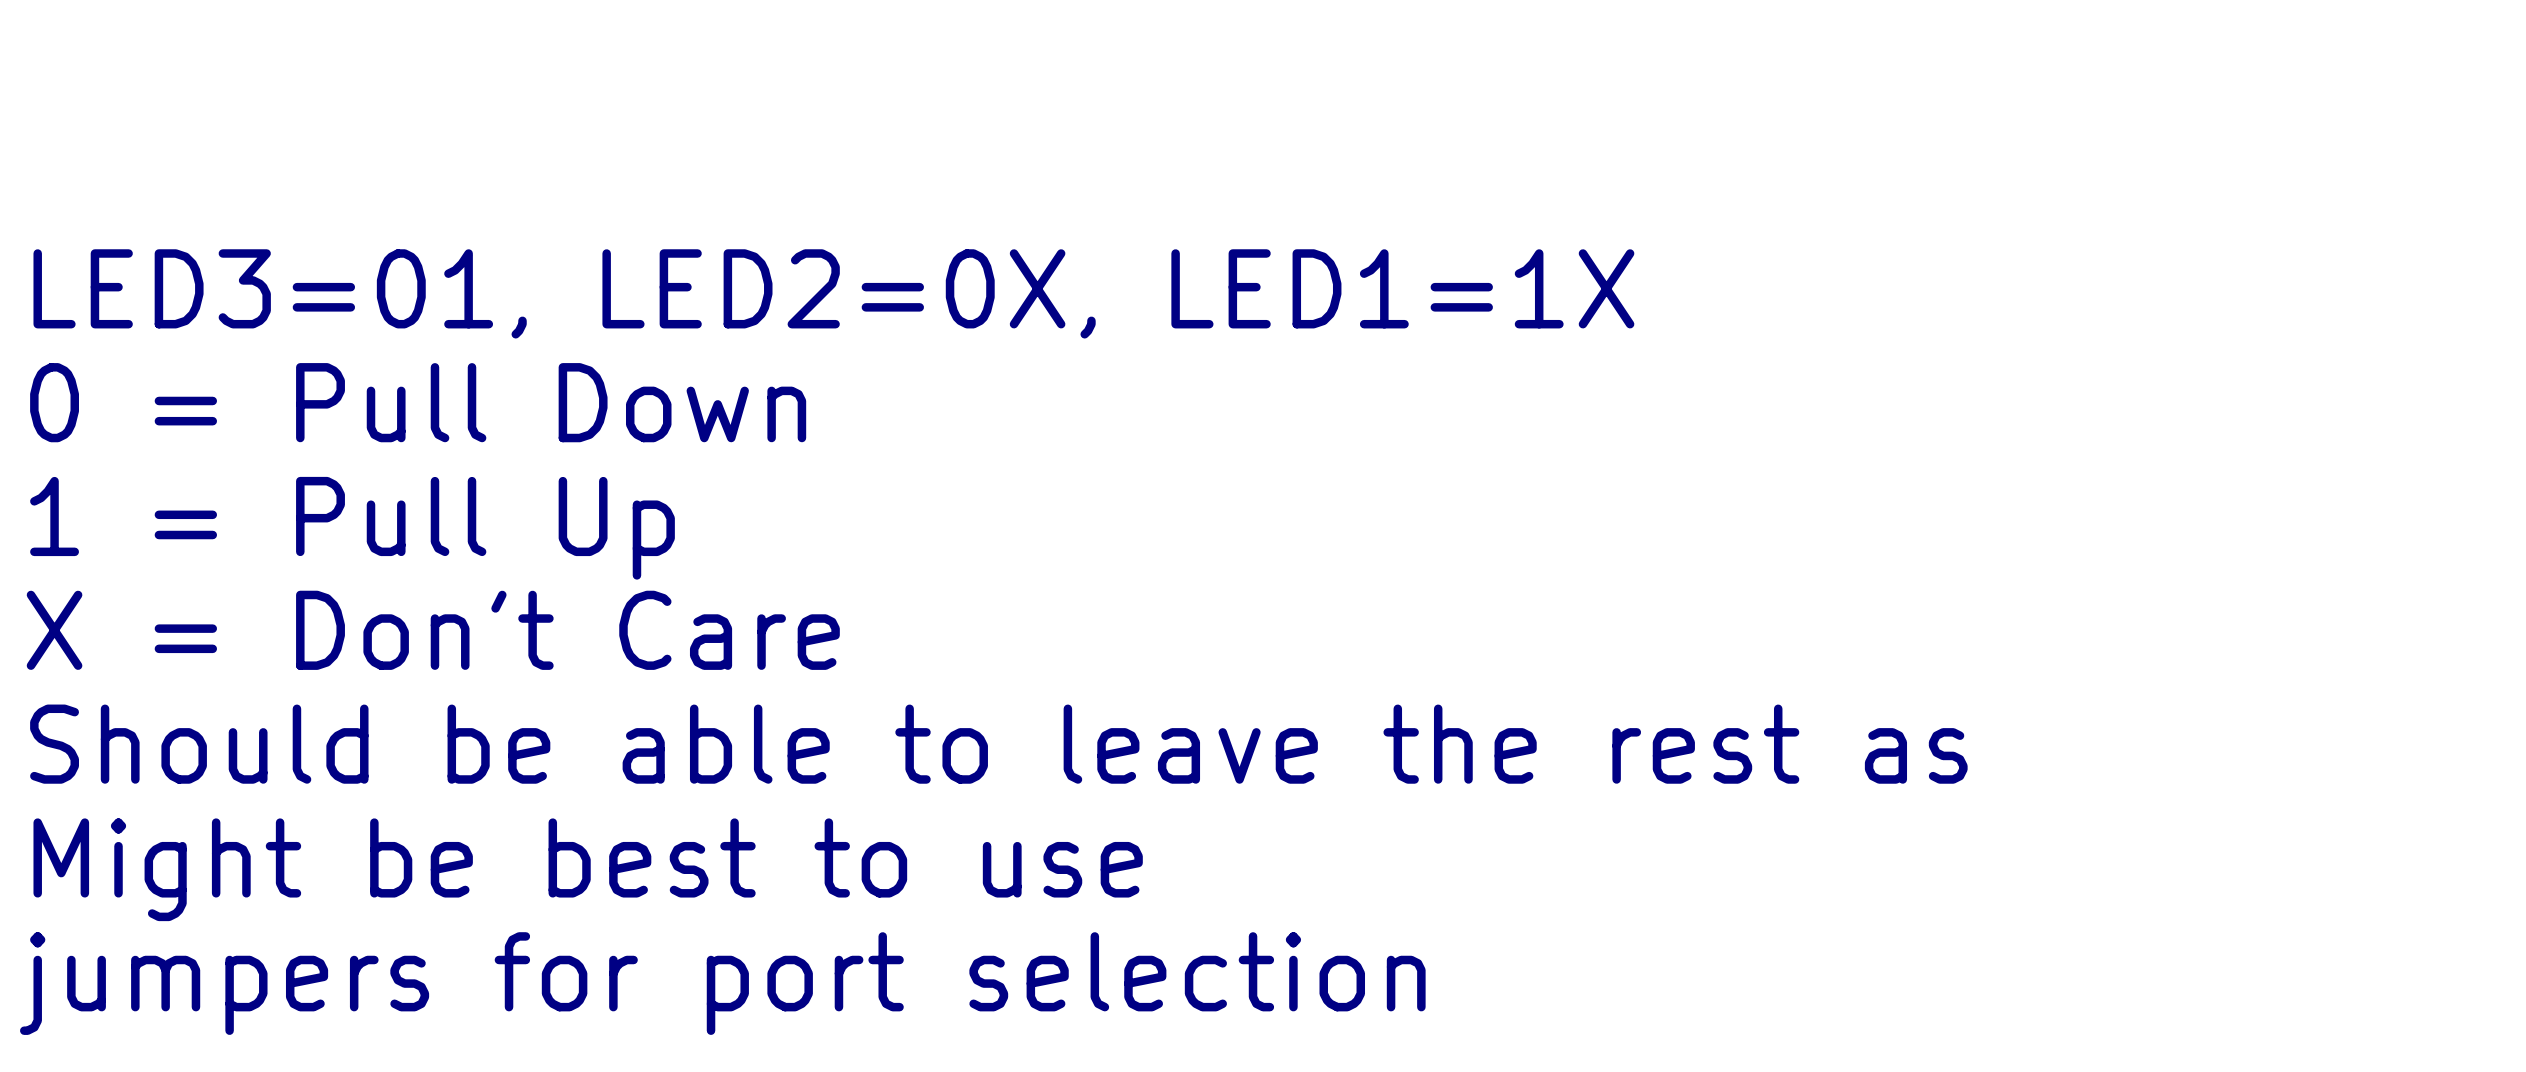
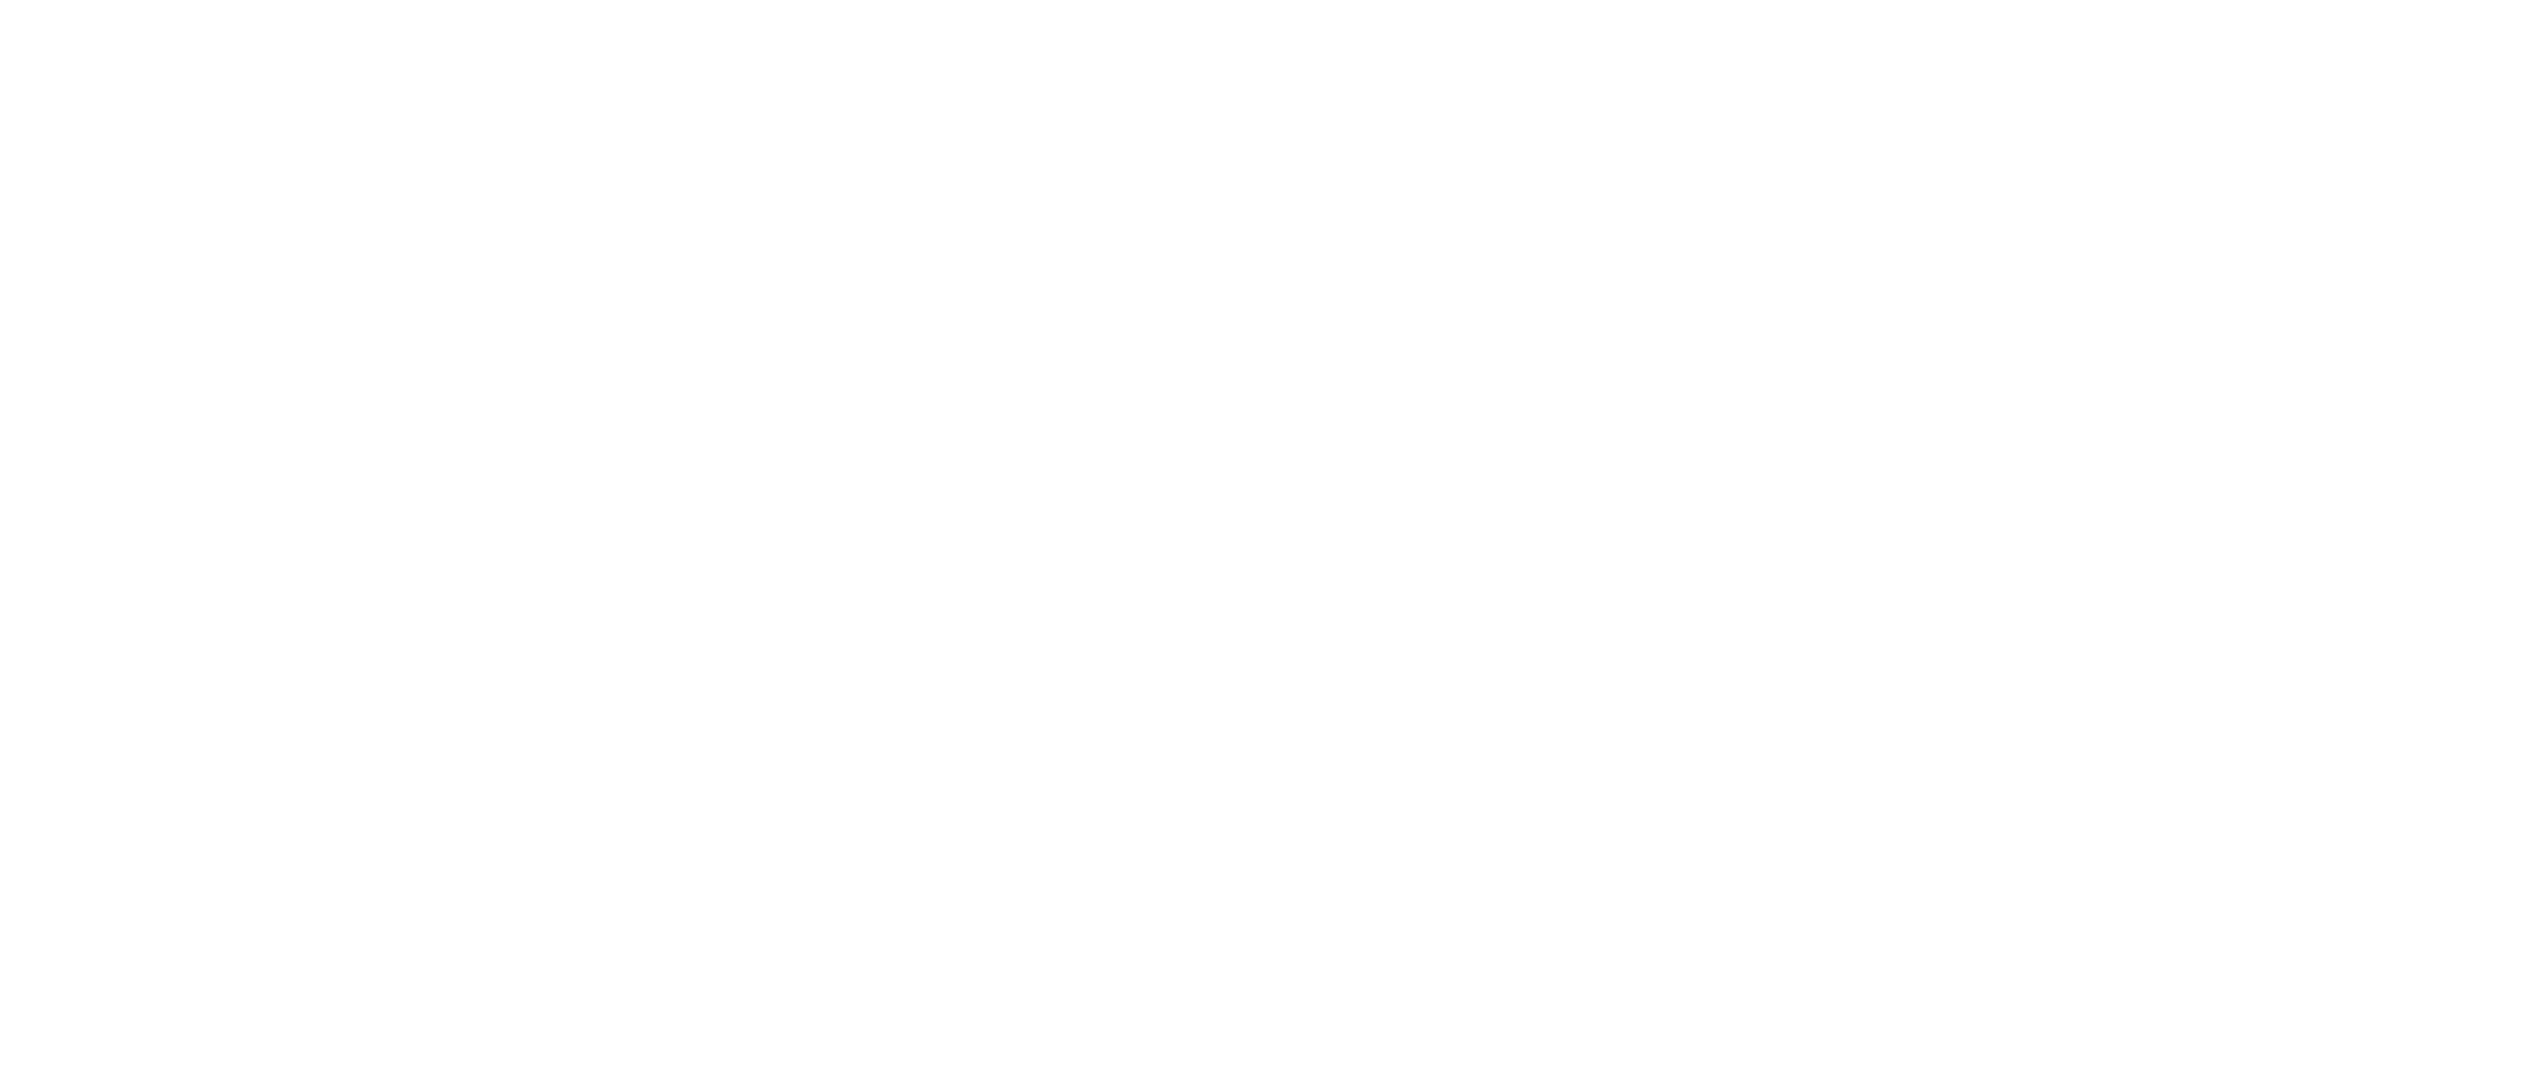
text: LED3=01, LED2=0X, LED1=1X (833, 293) -> none
text: 0 = Pull Down (418, 402) -> none
text: 1 = Pull Up (352, 528) -> none
text: X = Don't Care (433, 630) -> none
text: Should be able to leave the rest as (998, 744) -> none
text: Might be best to use (588, 869) -> none
text: jumpers for port selection (722, 983) -> none

